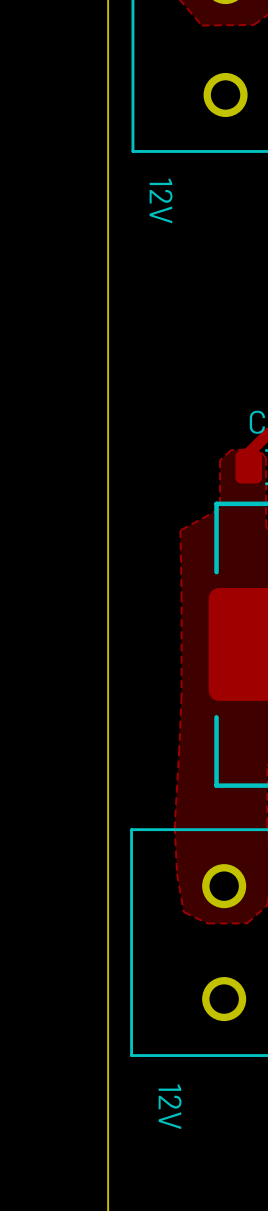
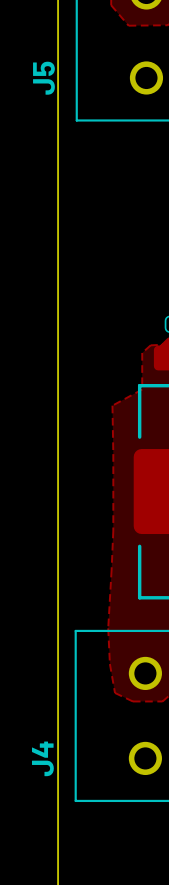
J5 name: none -> J5 (43, 78)
J5 text: 12V (161, 200) -> none
J4 name: none -> J4 (42, 758)
J4 text: 12V (170, 1106) -> none

